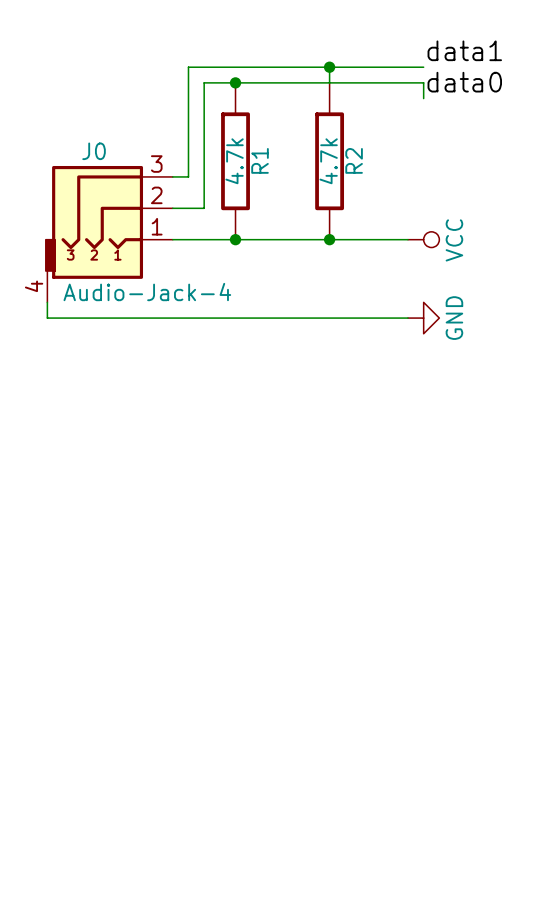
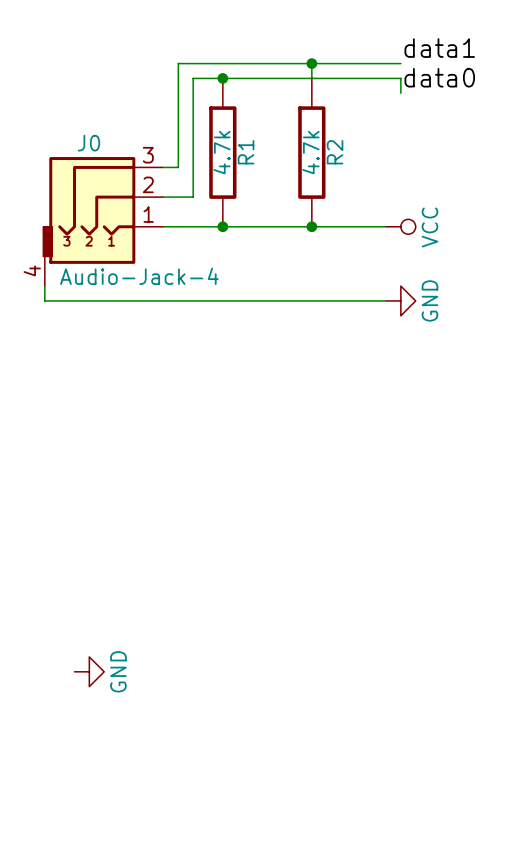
power symbol: none -> GND (89, 671)

